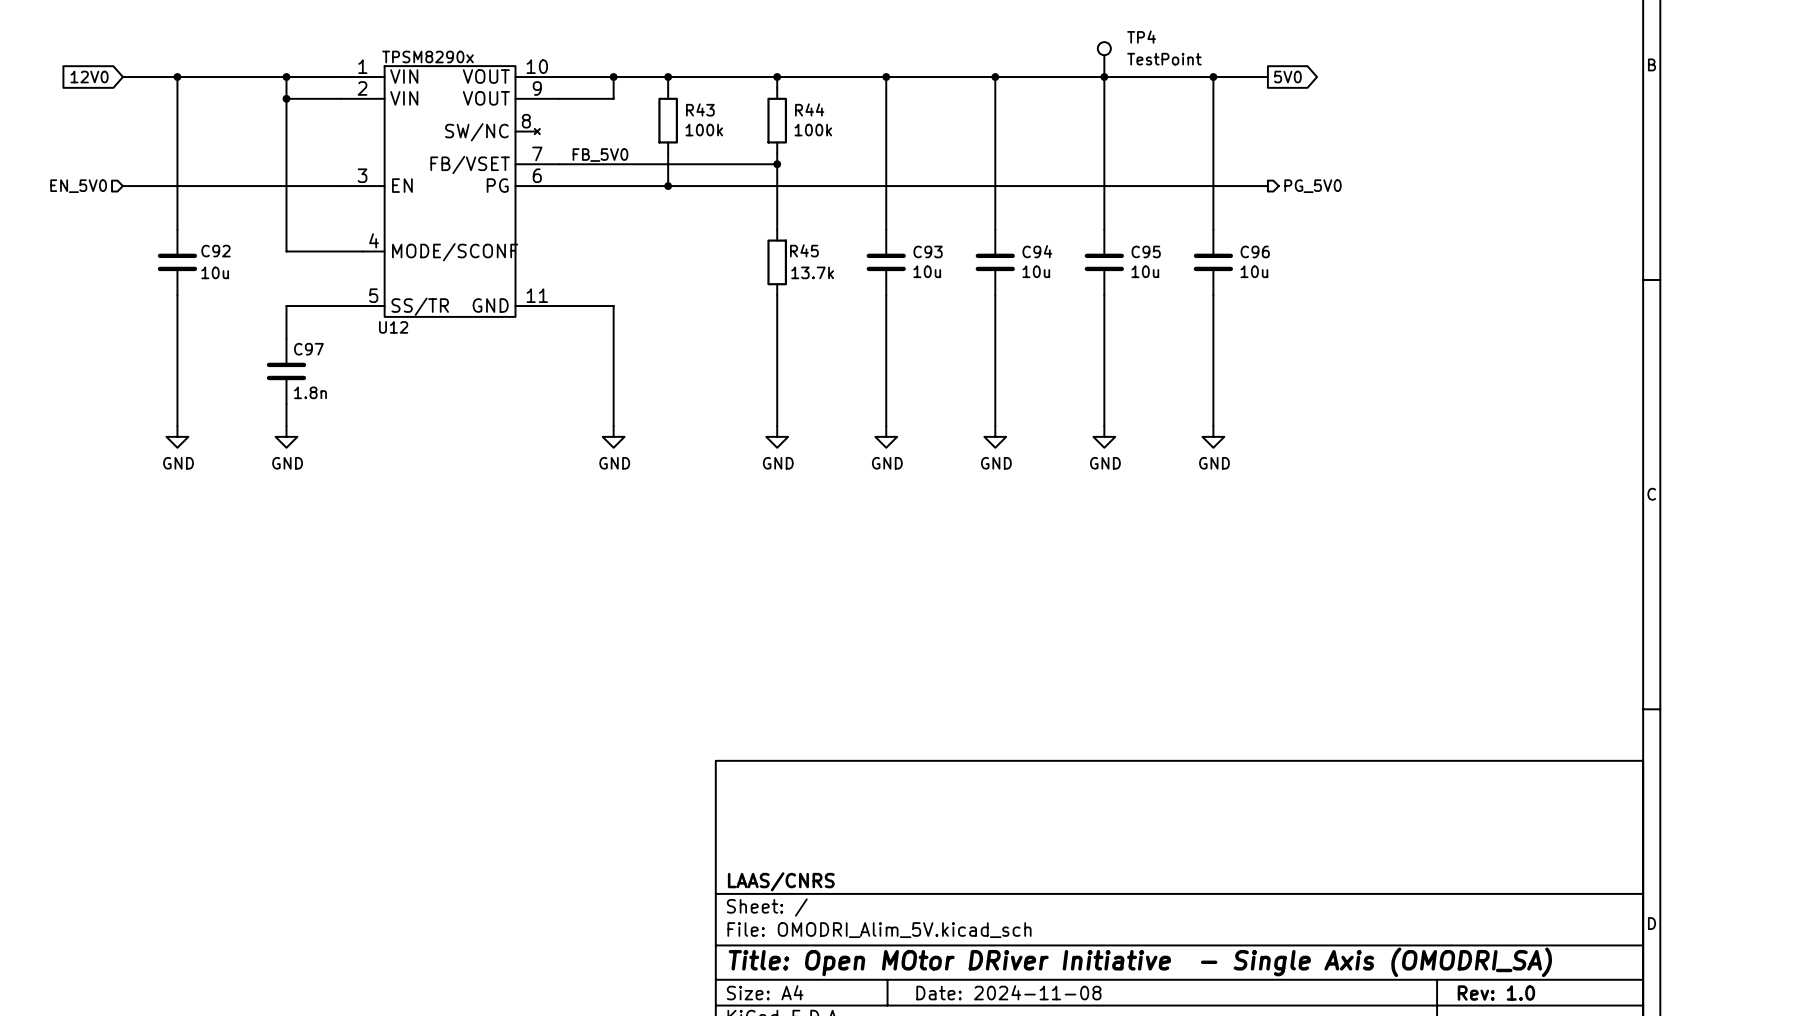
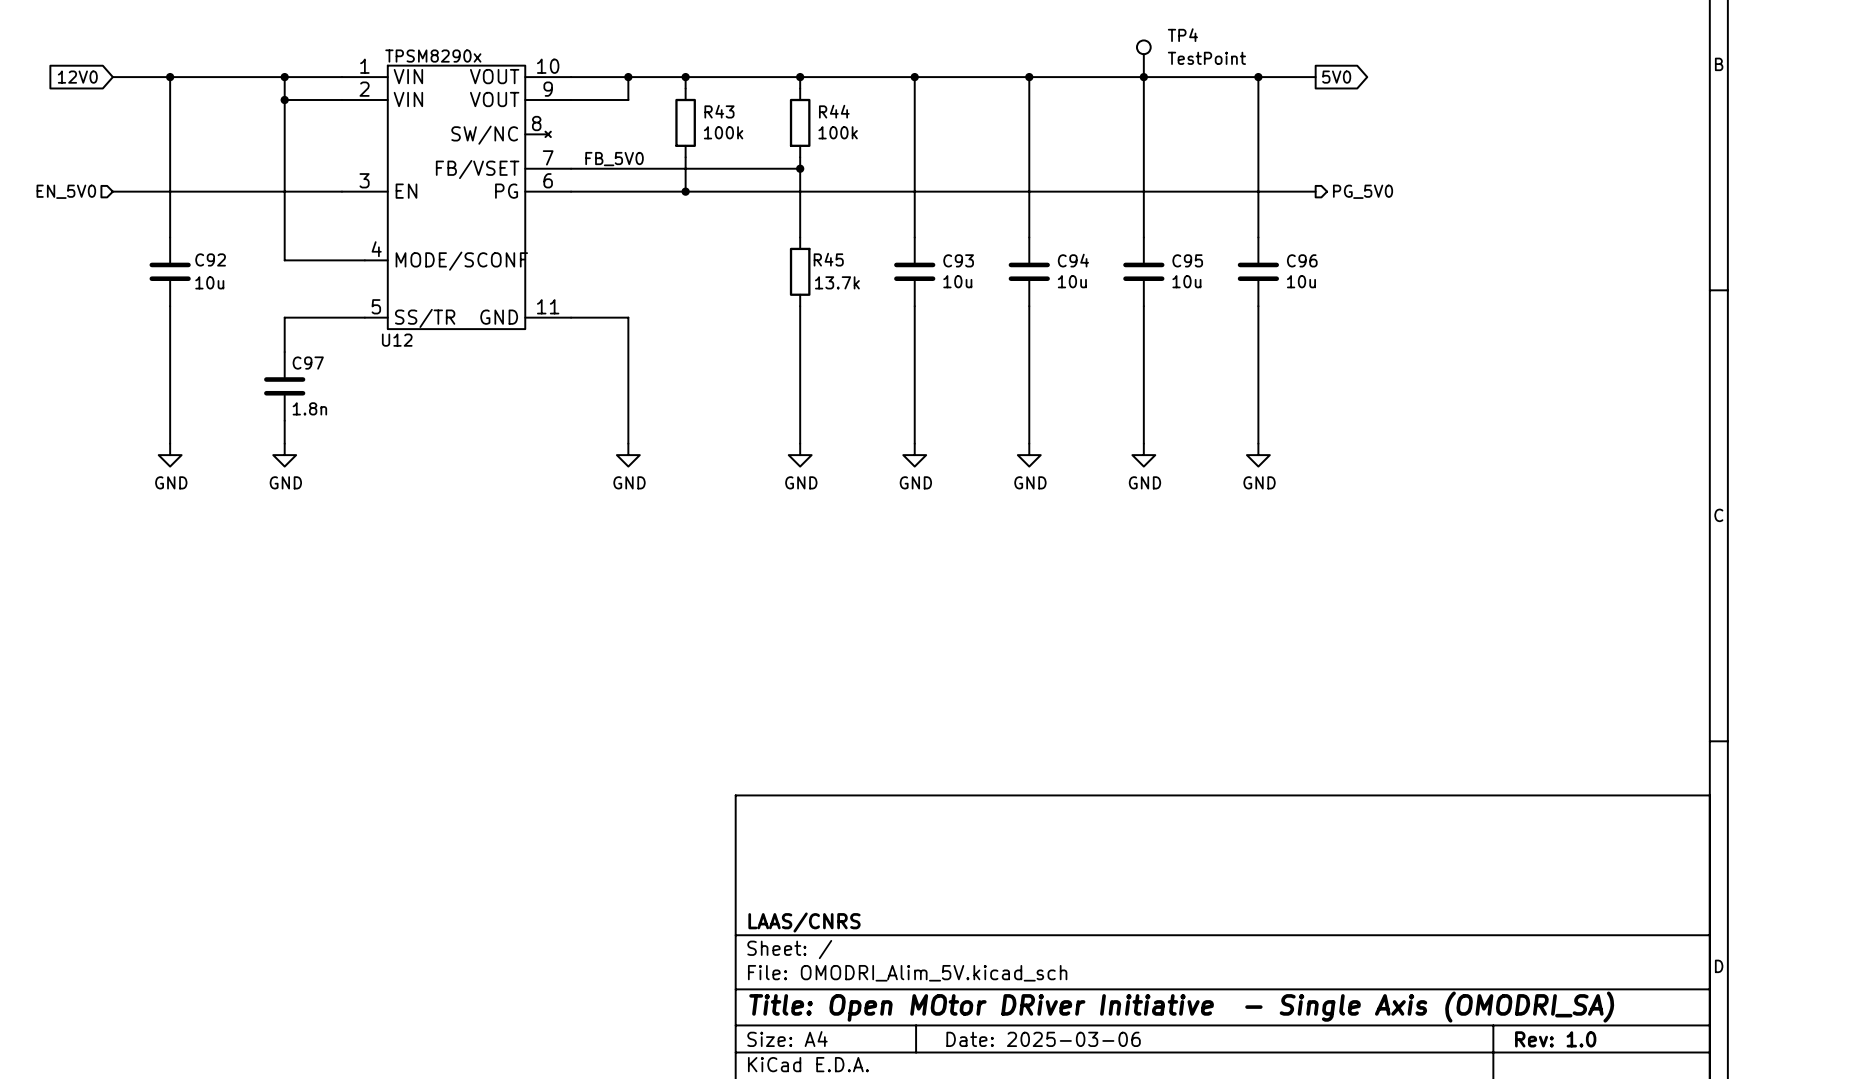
title block: Date: 2024-11-08 (1008, 992) -> Date: 2025-03-06 (1043, 1039)

